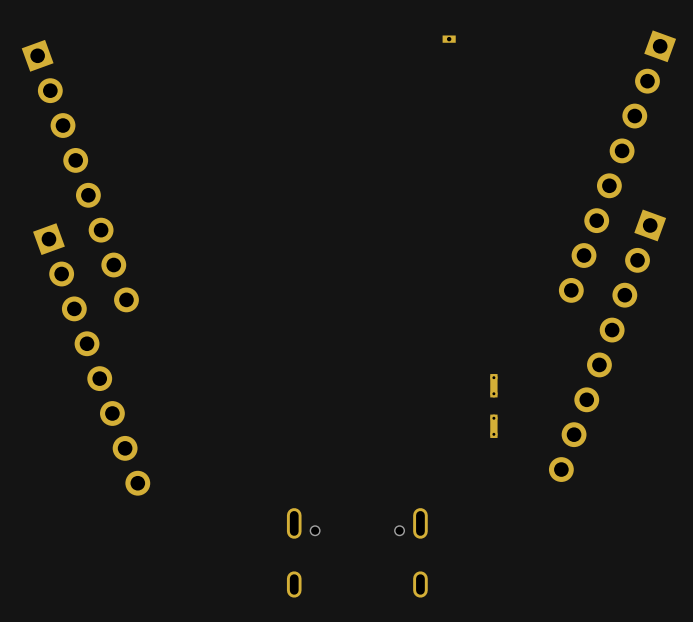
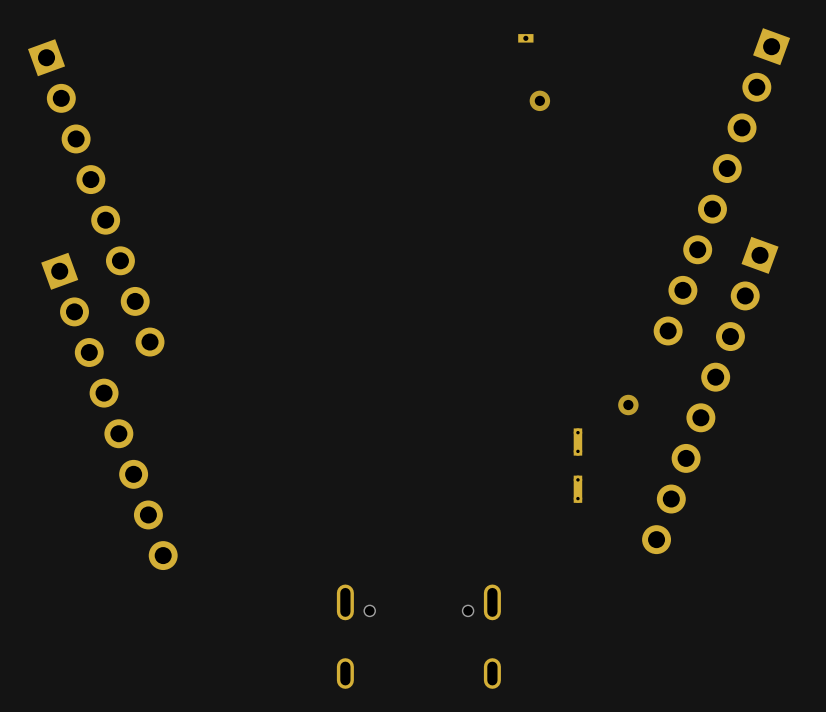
via: none -> (539, 100)
via: none -> (628, 405)

